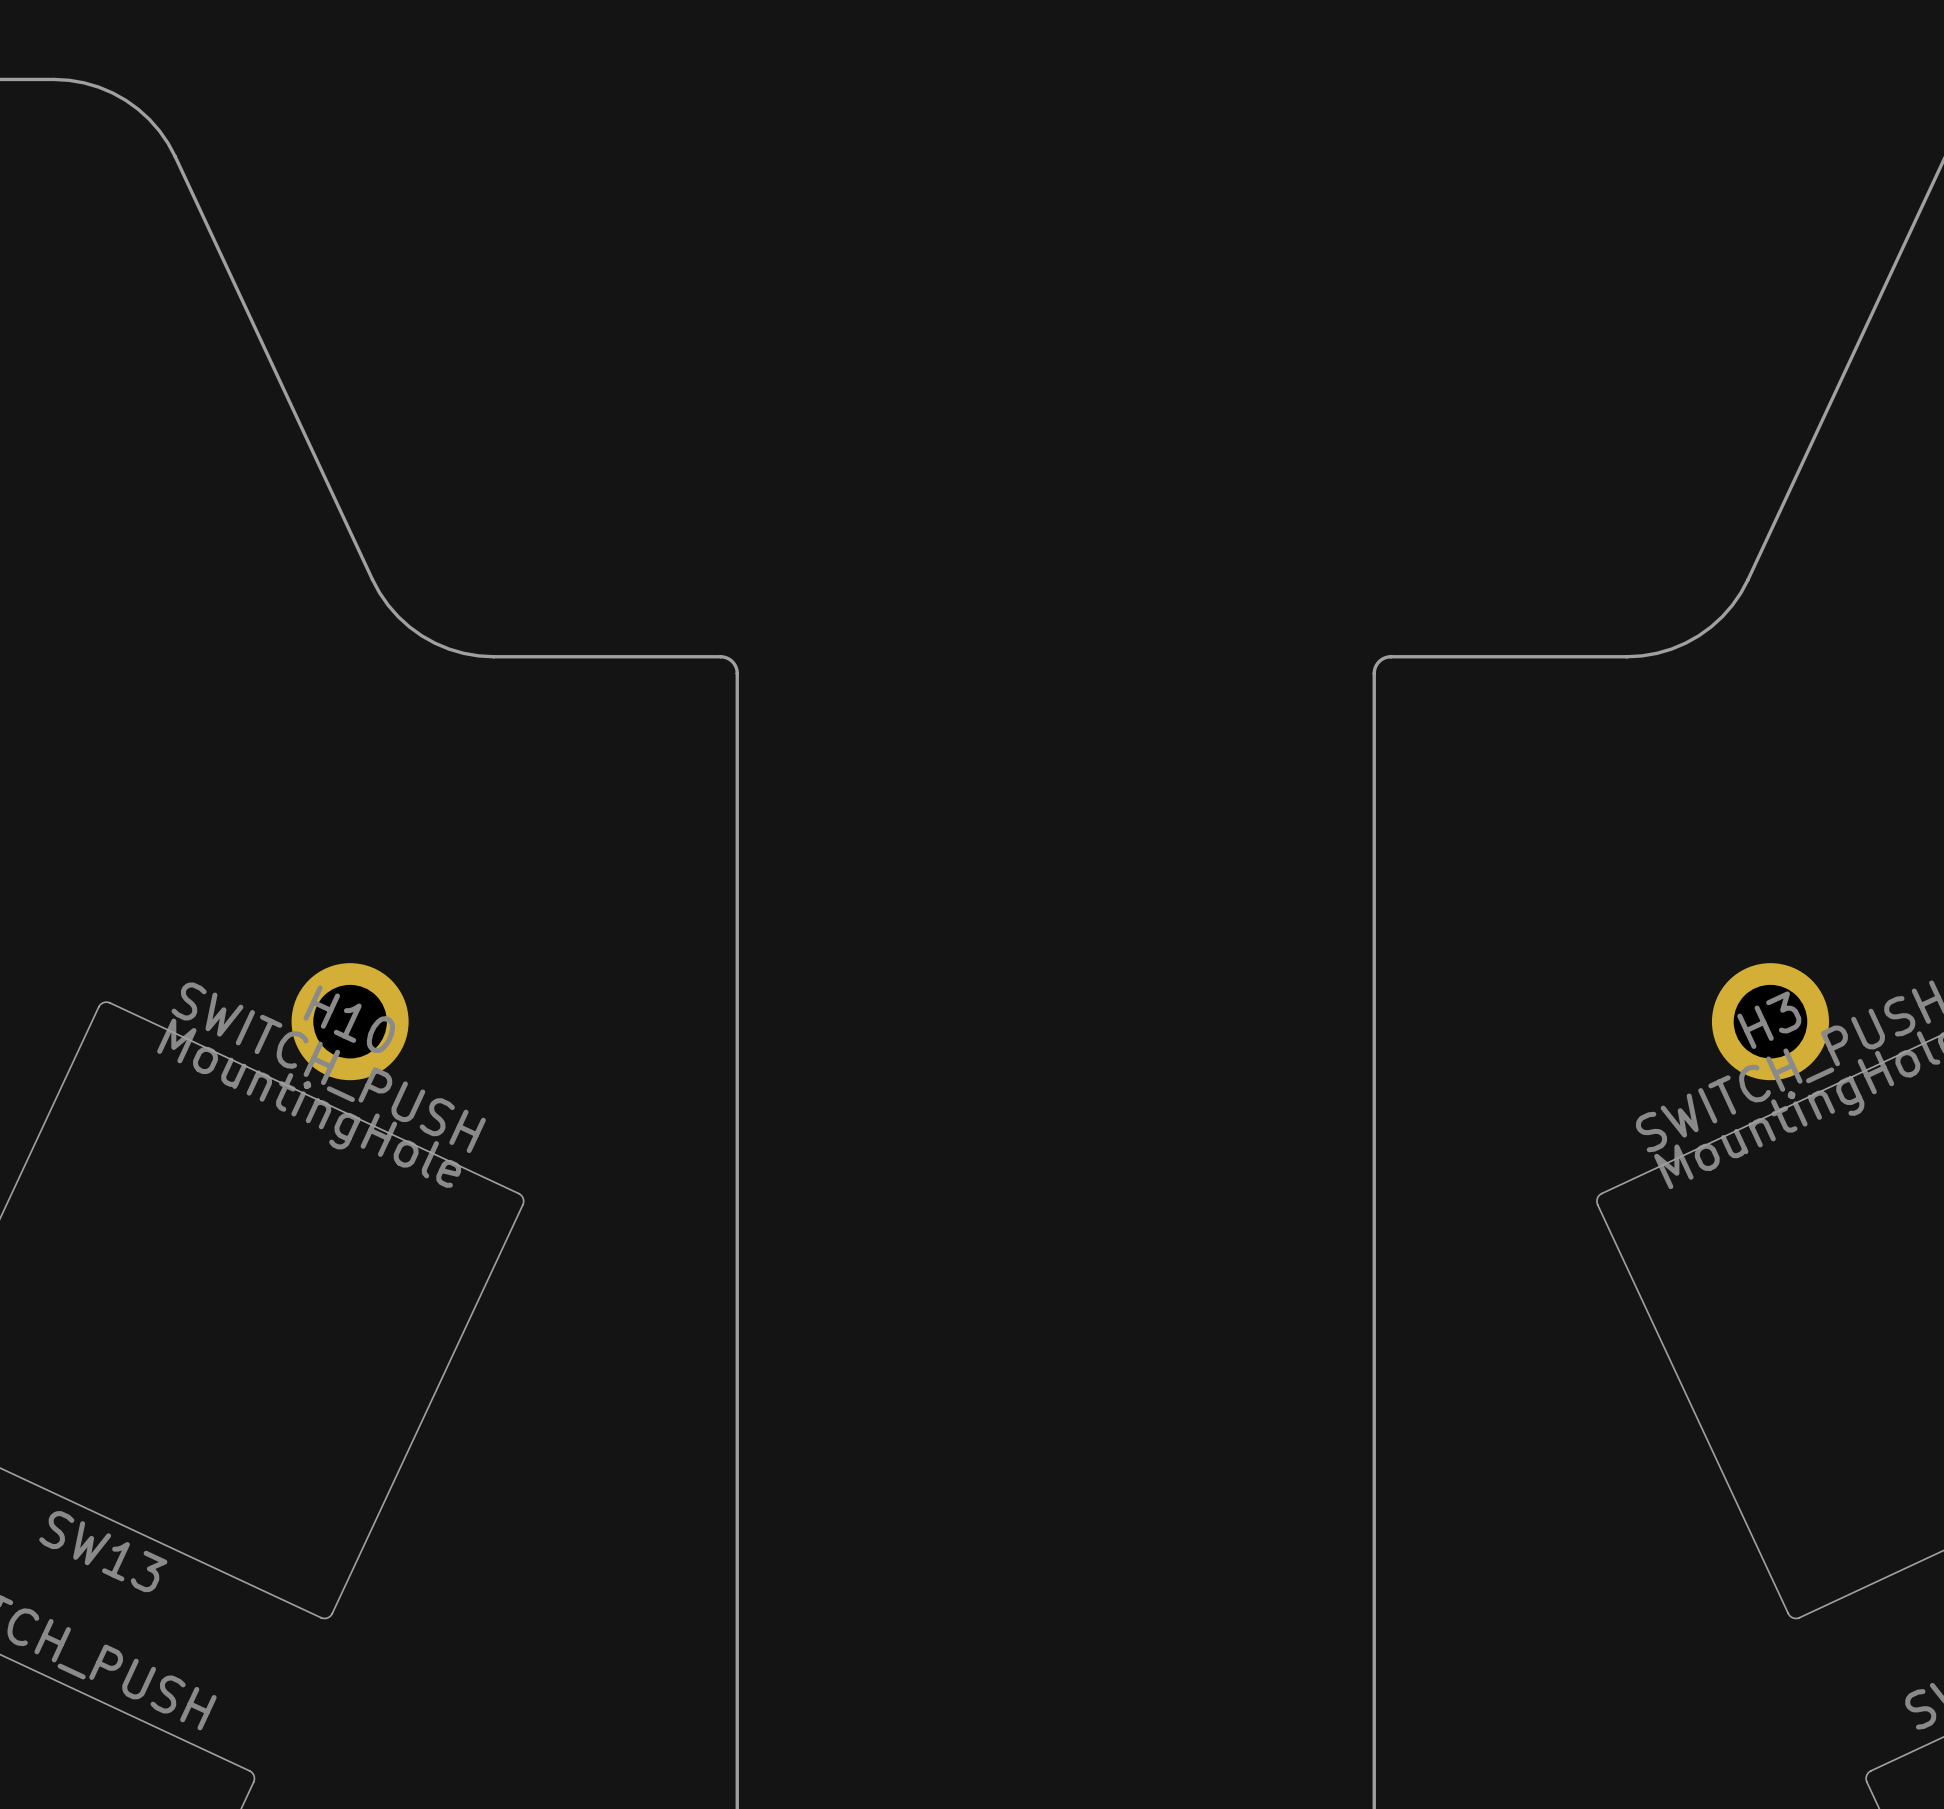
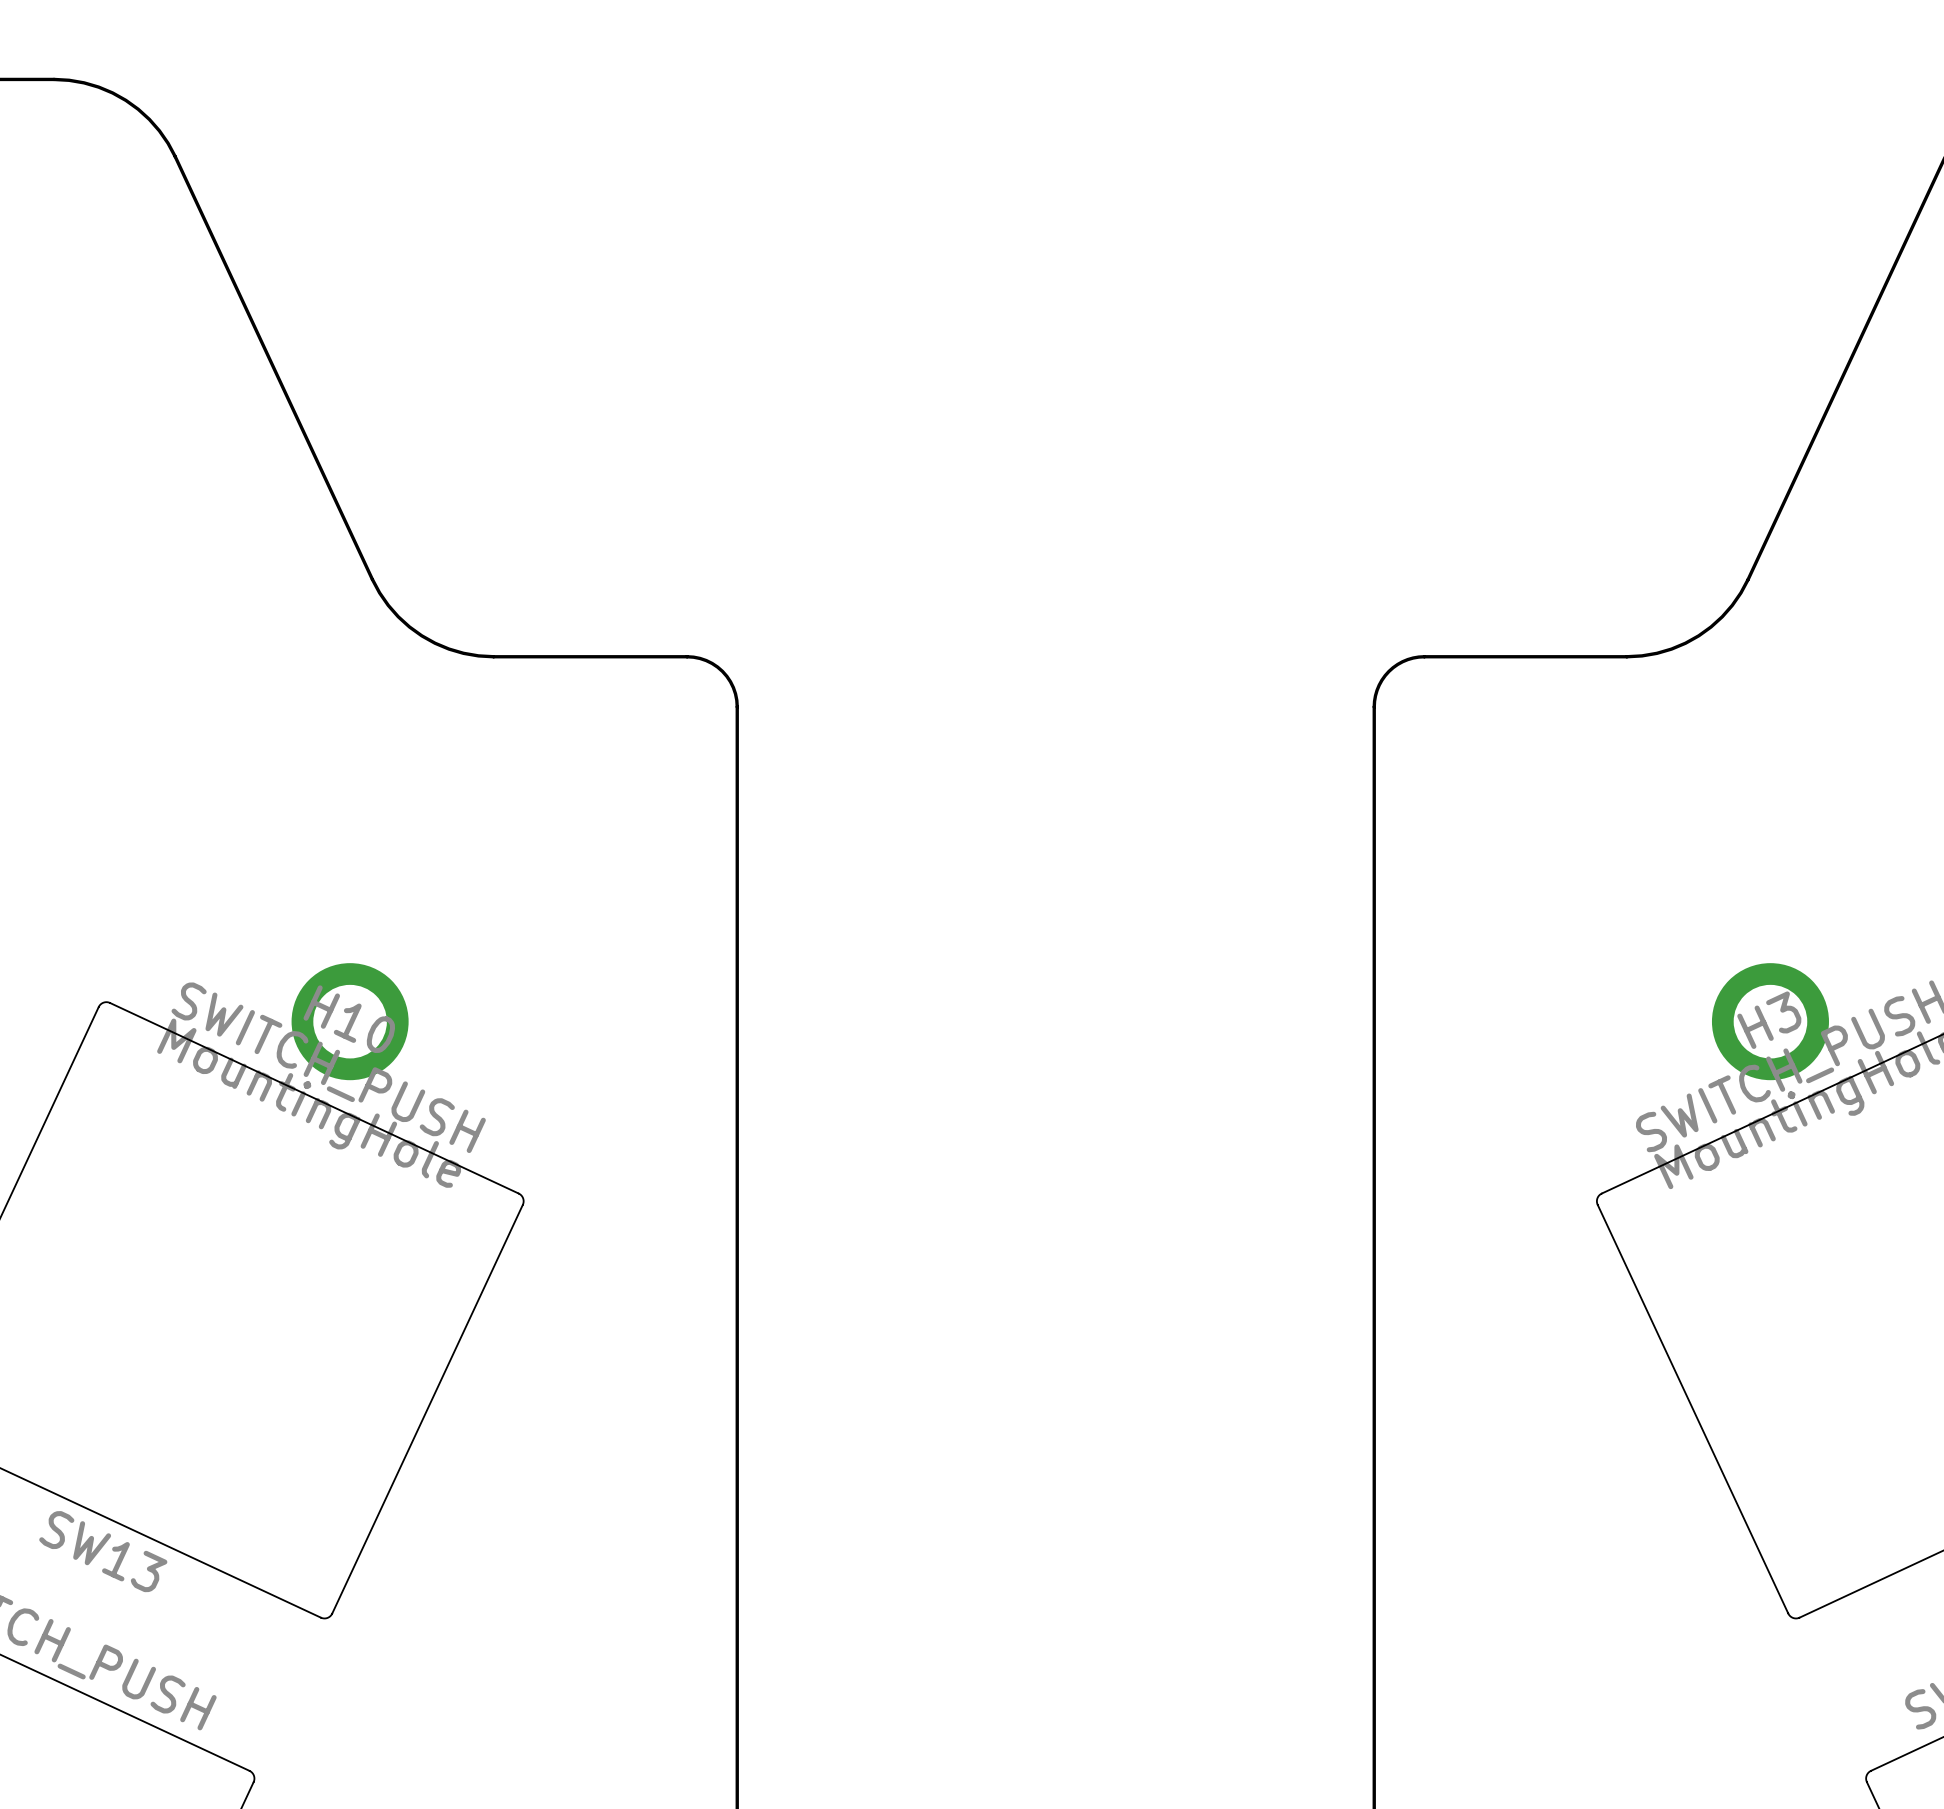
board edge: (687, 656) (722, 656) (732, 661) (737, 671) (737, 706) -> (687, 656) (706, 660) (722, 671) (733, 687) (737, 706)
board edge: (1424, 656) (1389, 656) (1379, 661) (1374, 671) (1374, 706) -> (1424, 656) (1402, 661) (1388, 671) (1377, 690) (1374, 706)

